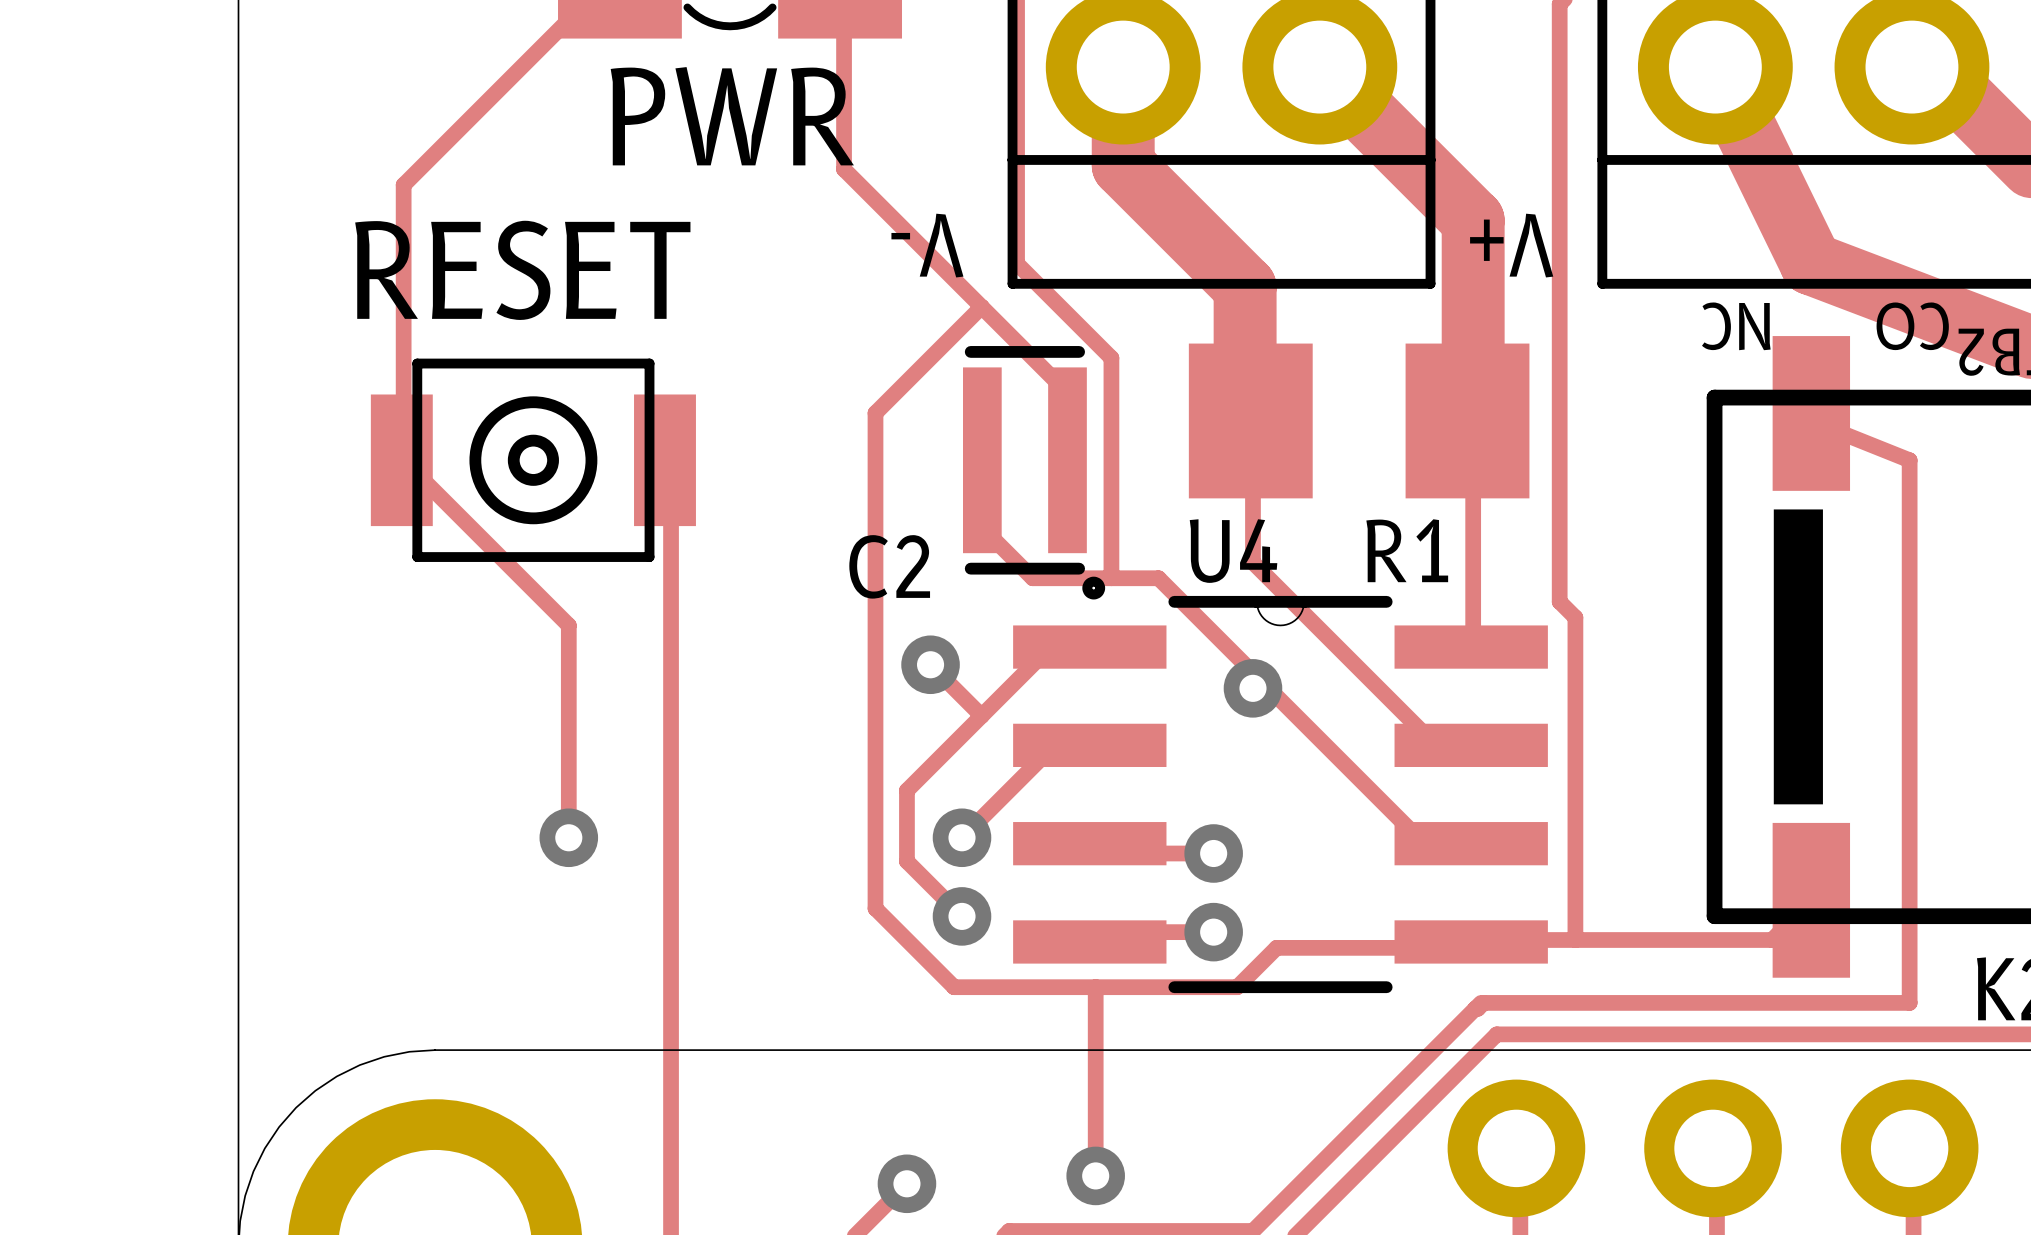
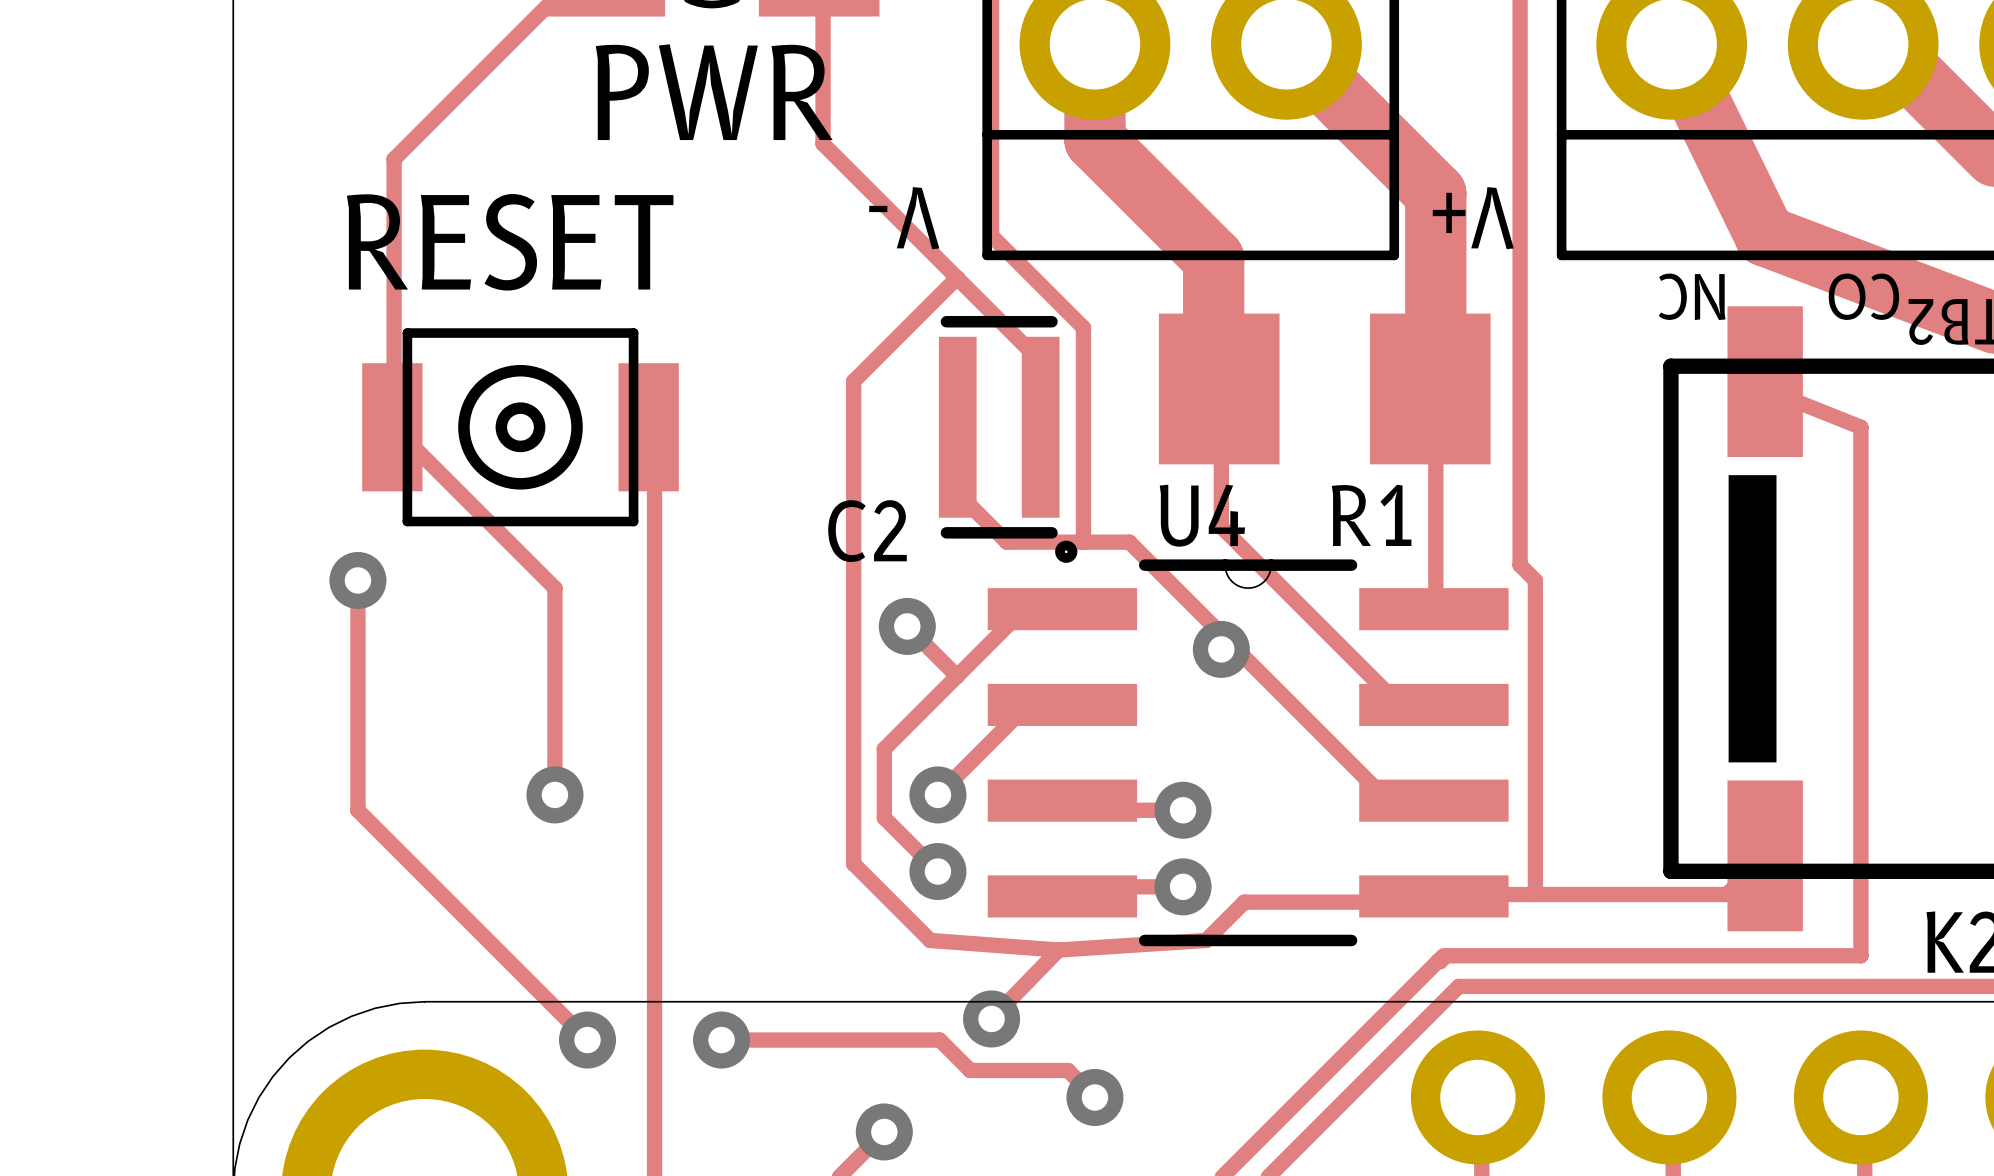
track: none -> (357, 580) (357, 810) (587, 1040)
via: none -> (357, 580)
track: (954, 987) (1237, 987) -> (1058, 950) (1206, 940)
track: none -> (930, 940) (1058, 950)
track: (1095, 987) (1095, 1175) -> none
track: none -> (1058, 950) (991, 1018)
via: none -> (991, 1018)
via: none -> (587, 1040)
track: none -> (721, 1040) (939, 1040) (970, 1070) (1067, 1070) (1094, 1097)
via: none -> (721, 1040)
via position: (1095, 1175) -> (1094, 1097)

